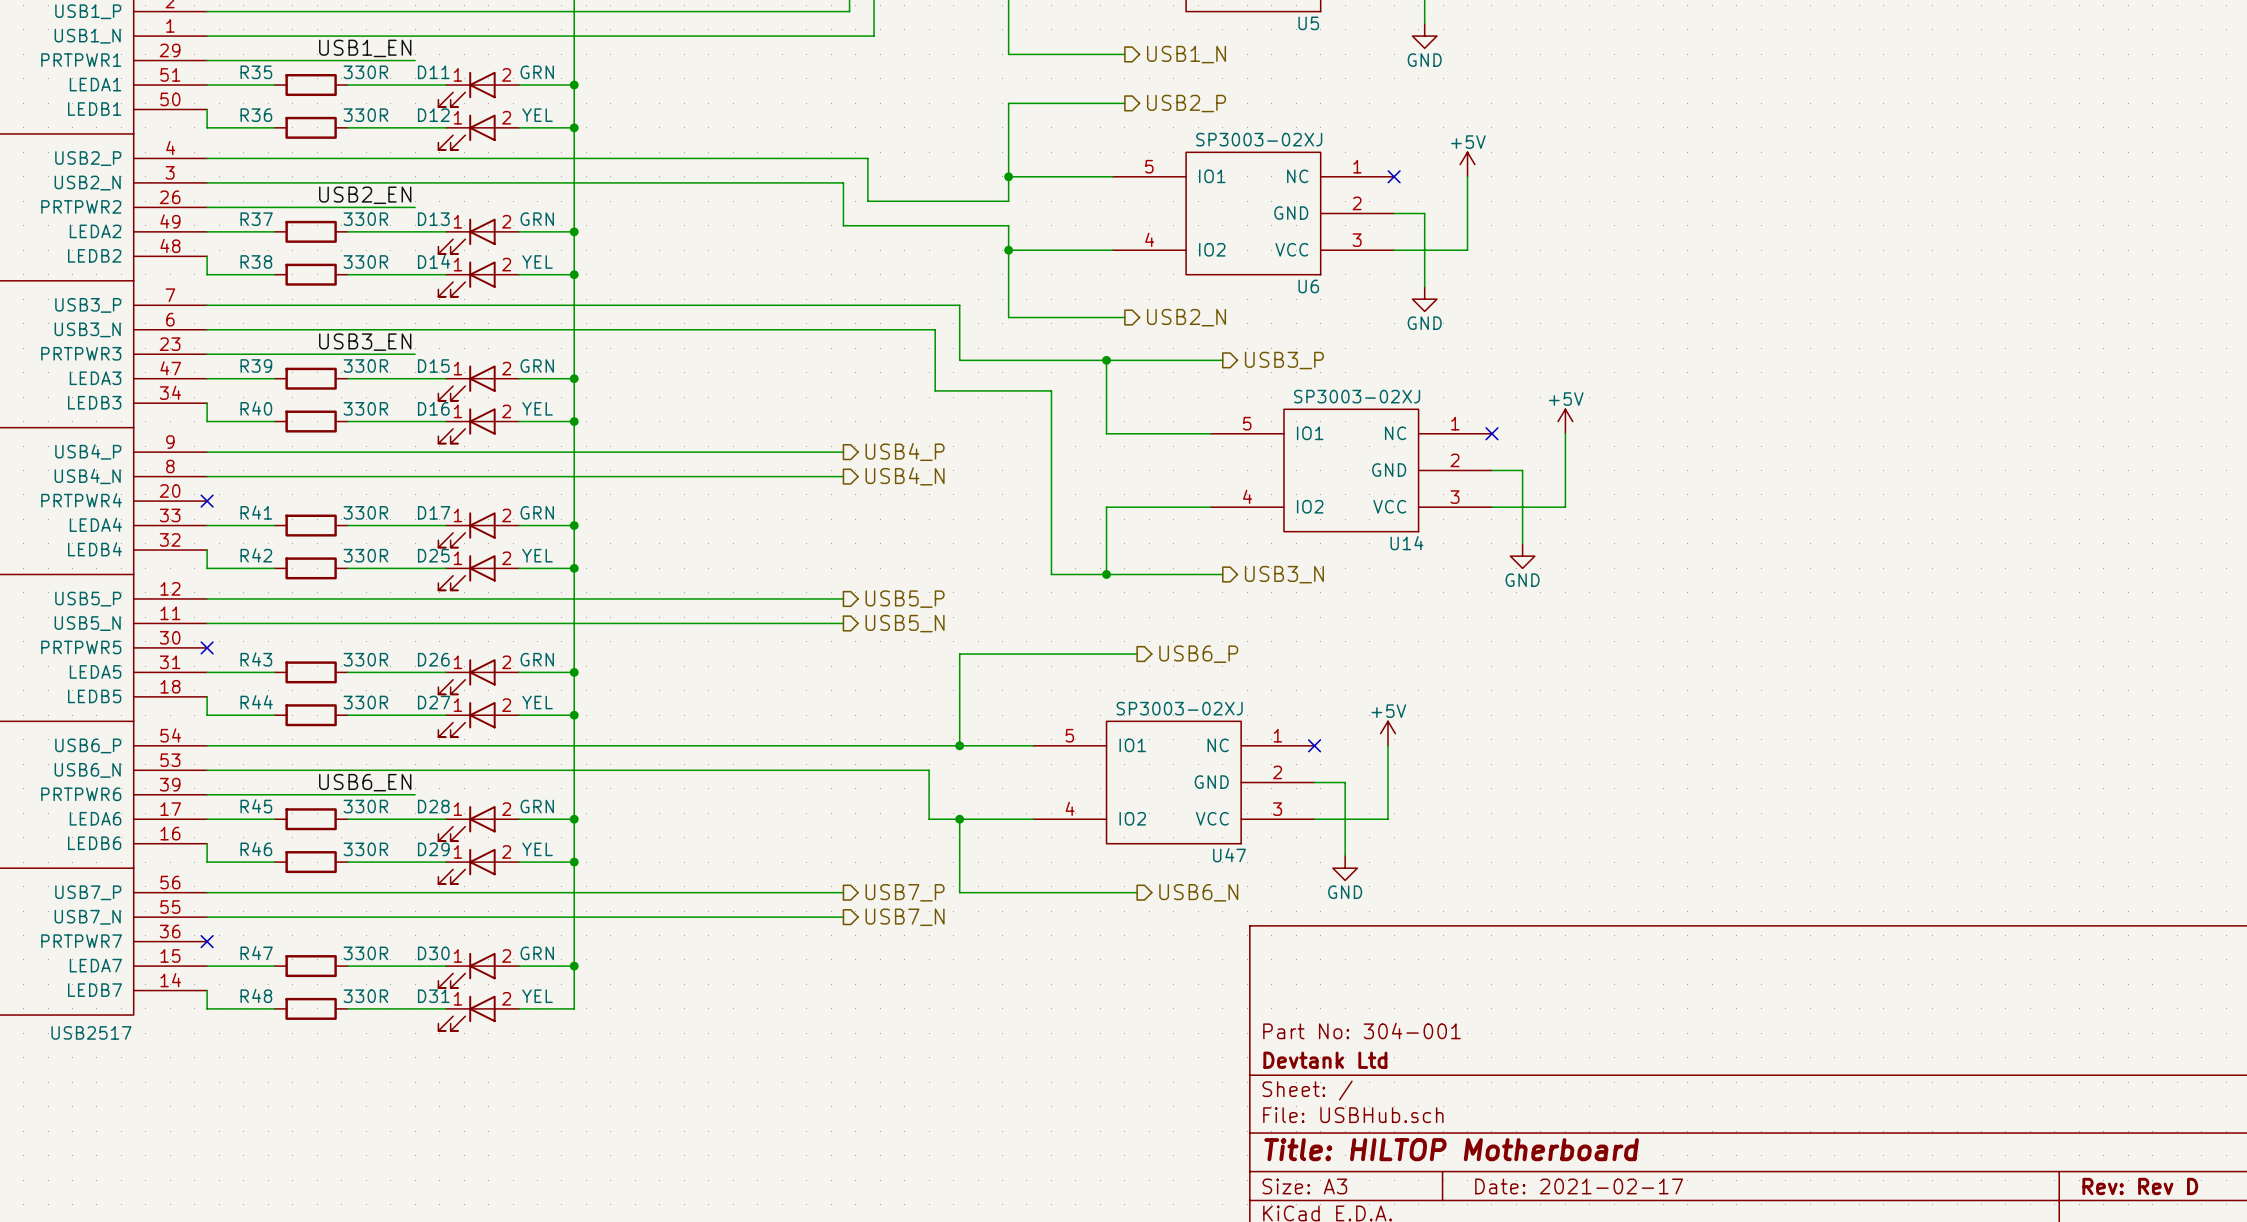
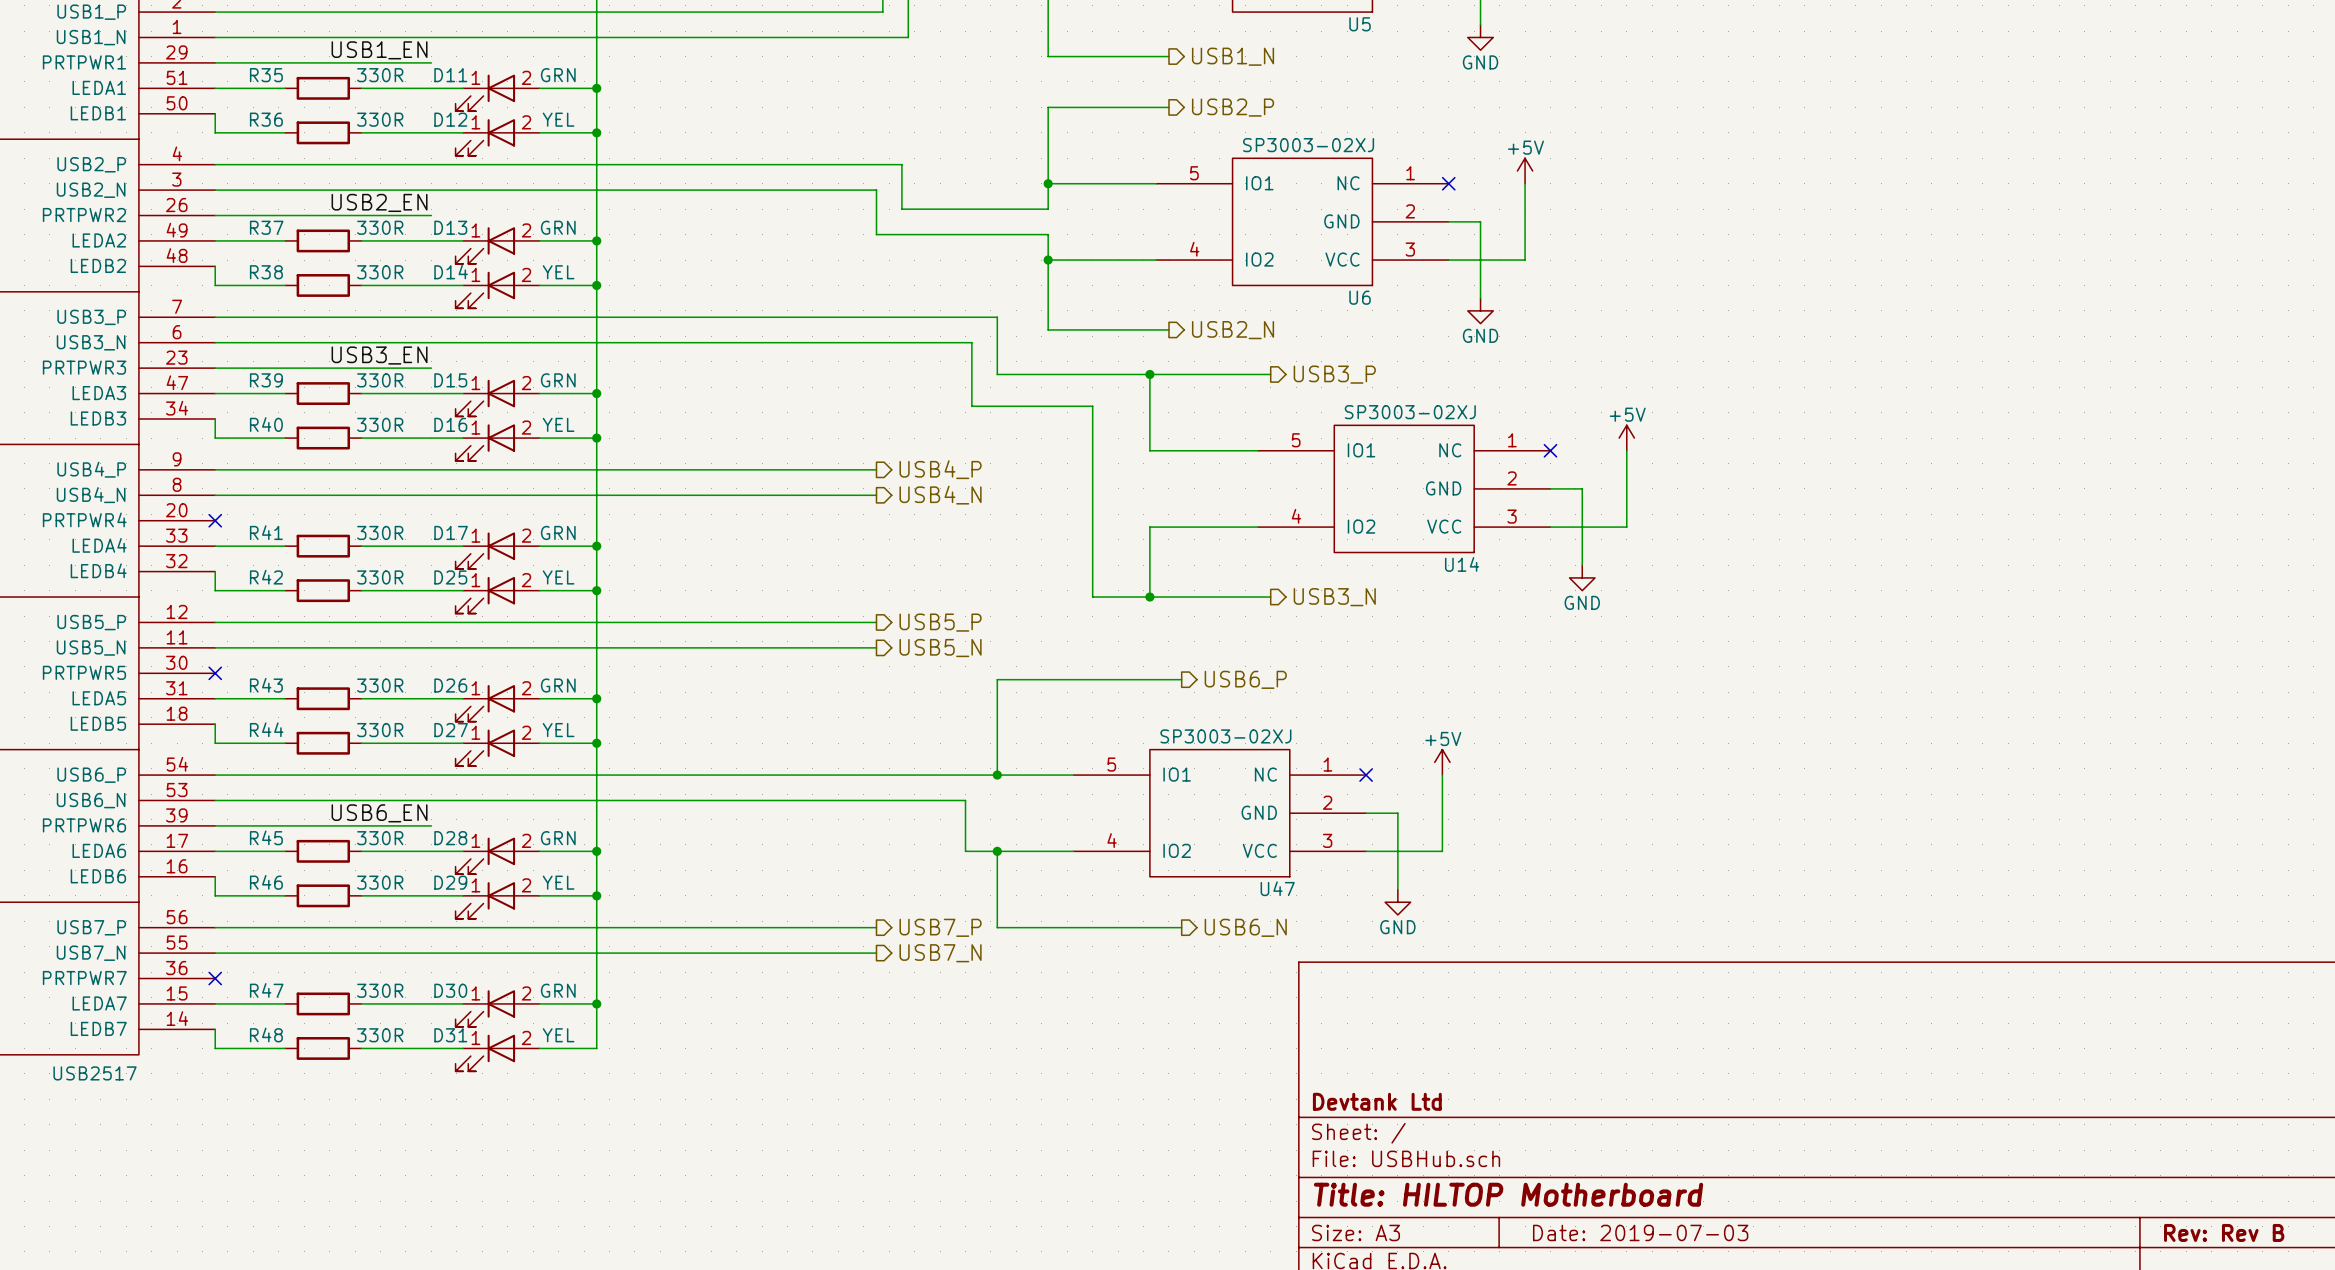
title block: Part No: 304-001 (1361, 1030) -> none
title block: Date: 2021-02-17 (1579, 1186) -> Date: 2019-07-03 (1640, 1232)
title block: Rev: Rev D (2140, 1186) -> Rev: Rev B (2224, 1232)

